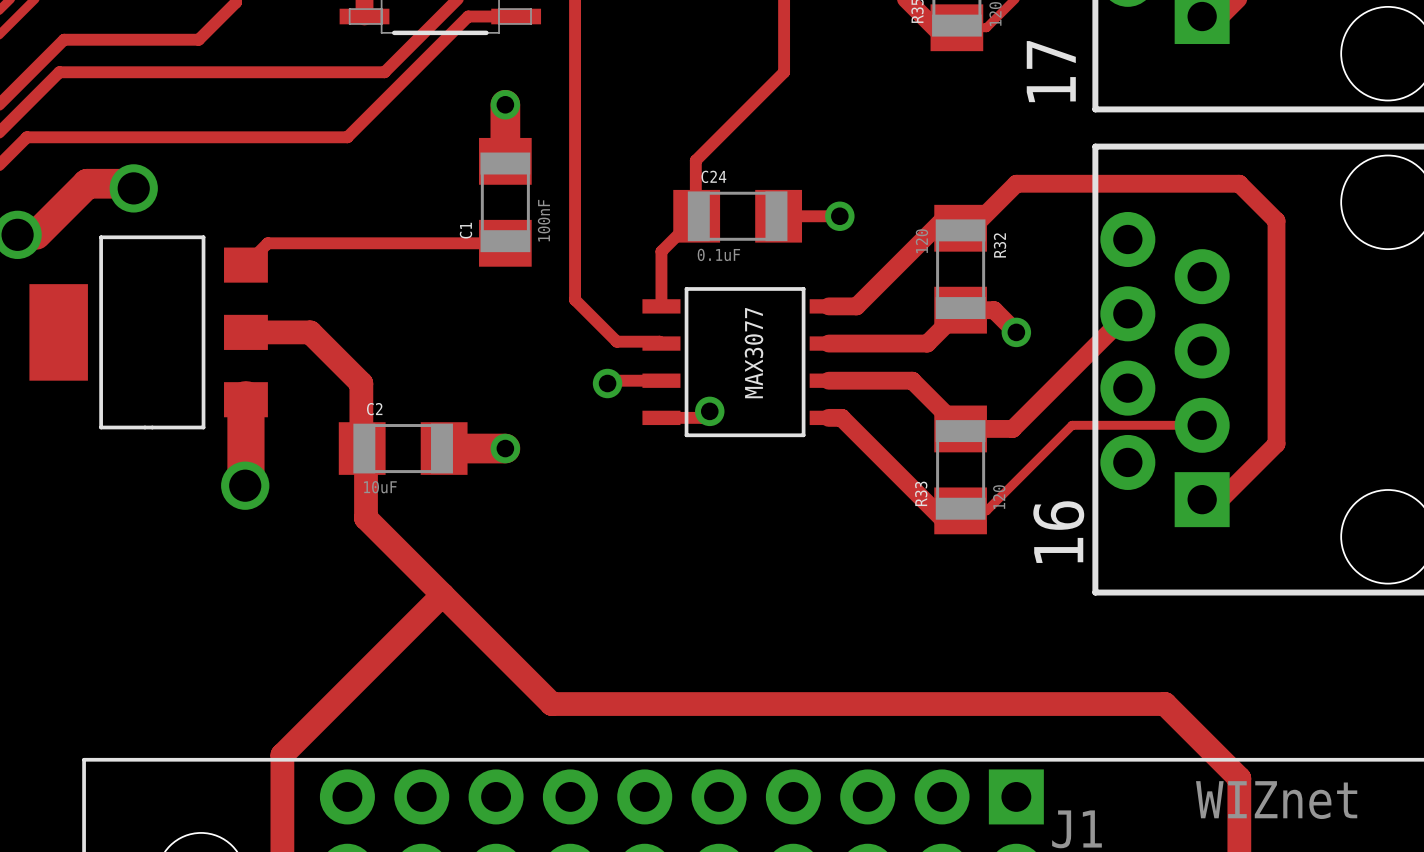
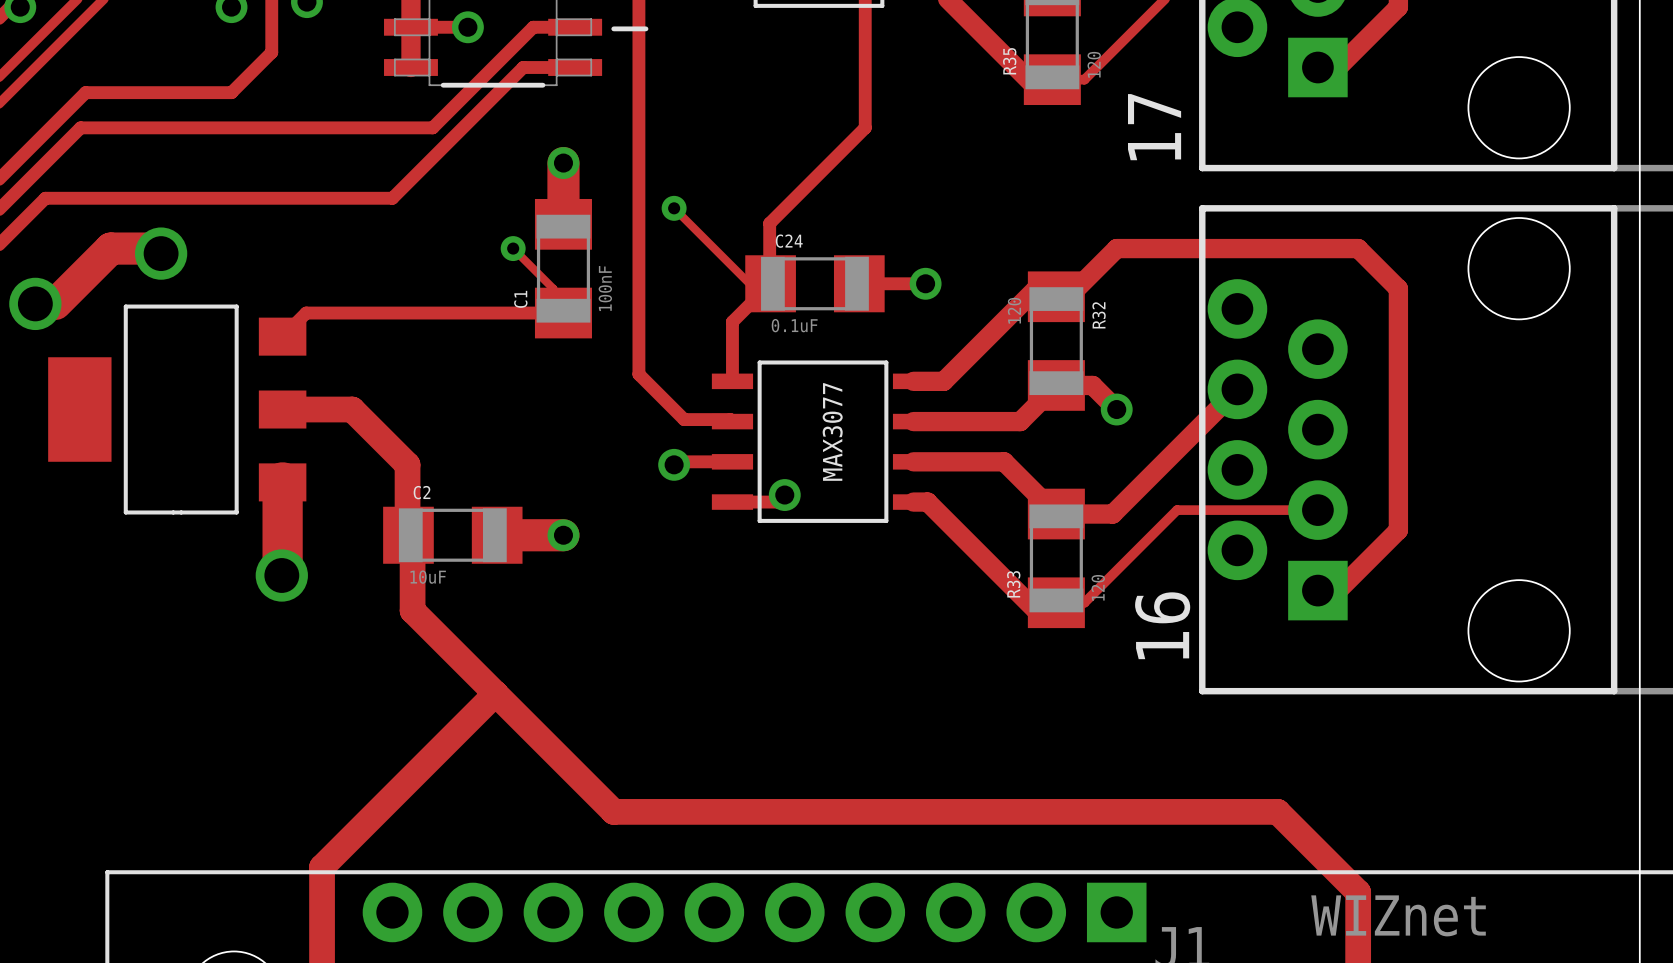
track: none -> (674, 208) (754, 288) (770, 283)
via: none -> (674, 208)
track: none -> (513, 248) (553, 288) (563, 313)
via: none -> (513, 248)

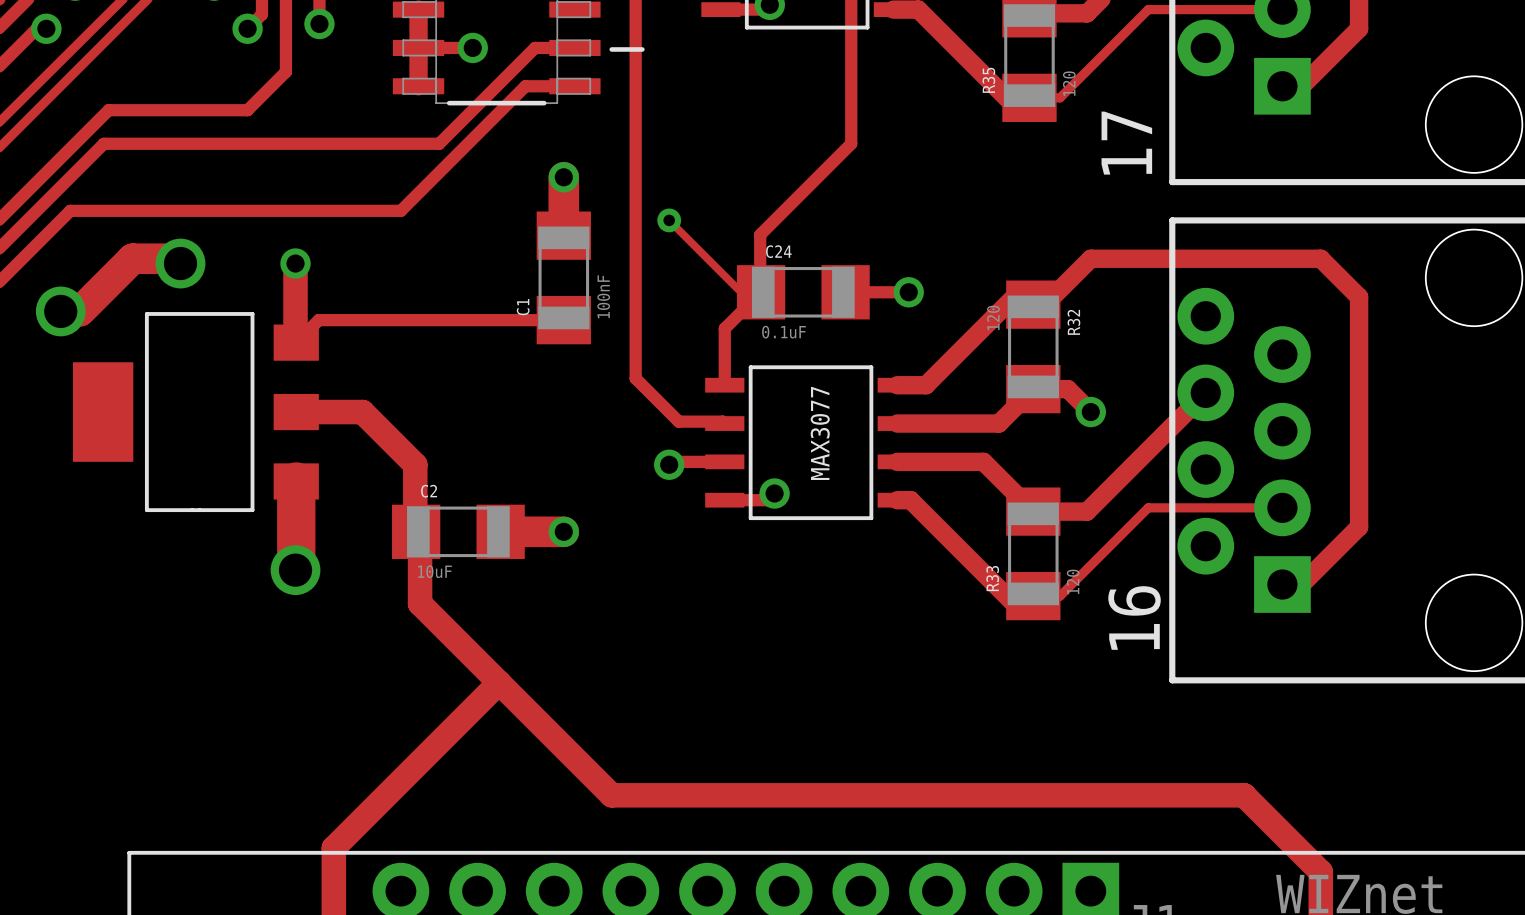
track: (513, 248) (553, 288) (563, 313) -> none
via: (513, 248) -> none
track: none -> (295, 263) (296, 342)
via: none -> (295, 263)

